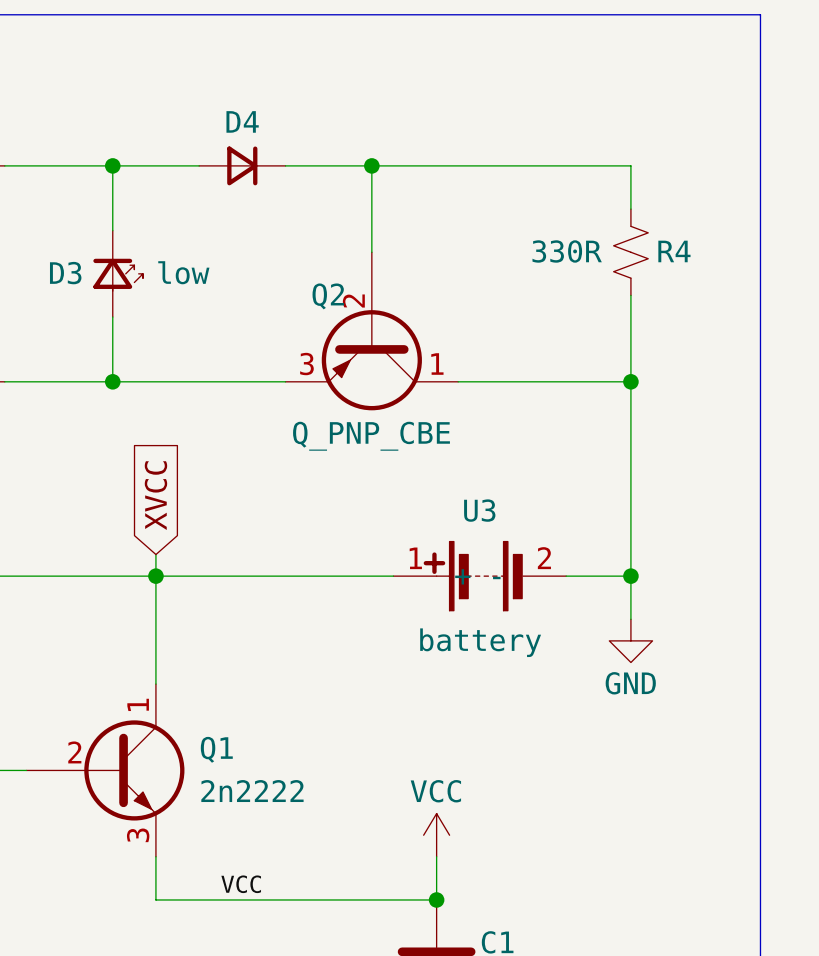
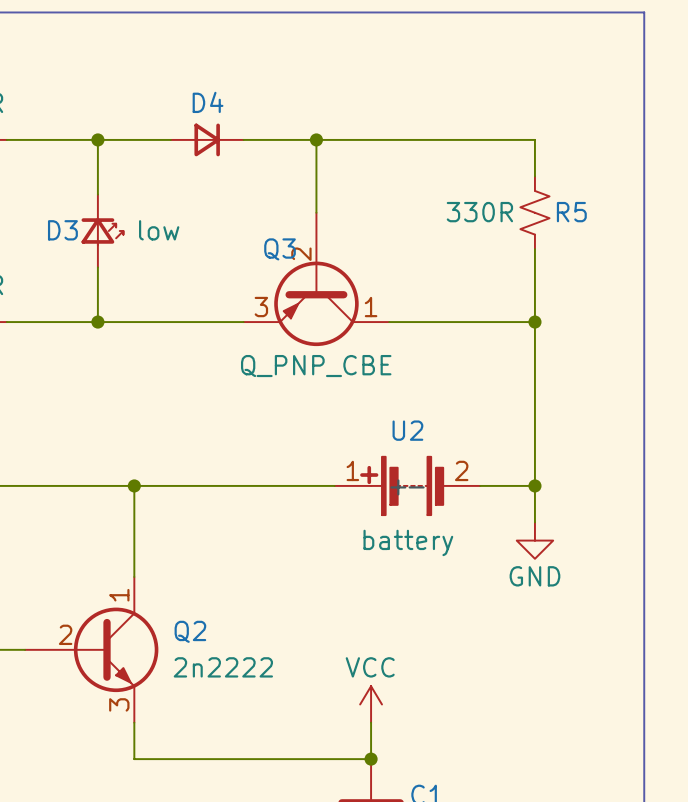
R4 name: R4 (674, 251) -> R5 (571, 212)
Q2 name: Q2 (328, 296) -> Q3 (280, 249)
global label: XVCC (155, 495) -> none
U3 name: U3 (479, 510) -> U2 (407, 430)
wire: (155, 554) (155, 576) -> none
Q1 name: Q1 (216, 749) -> Q2 (190, 631)
label: VCC (241, 884) -> none

